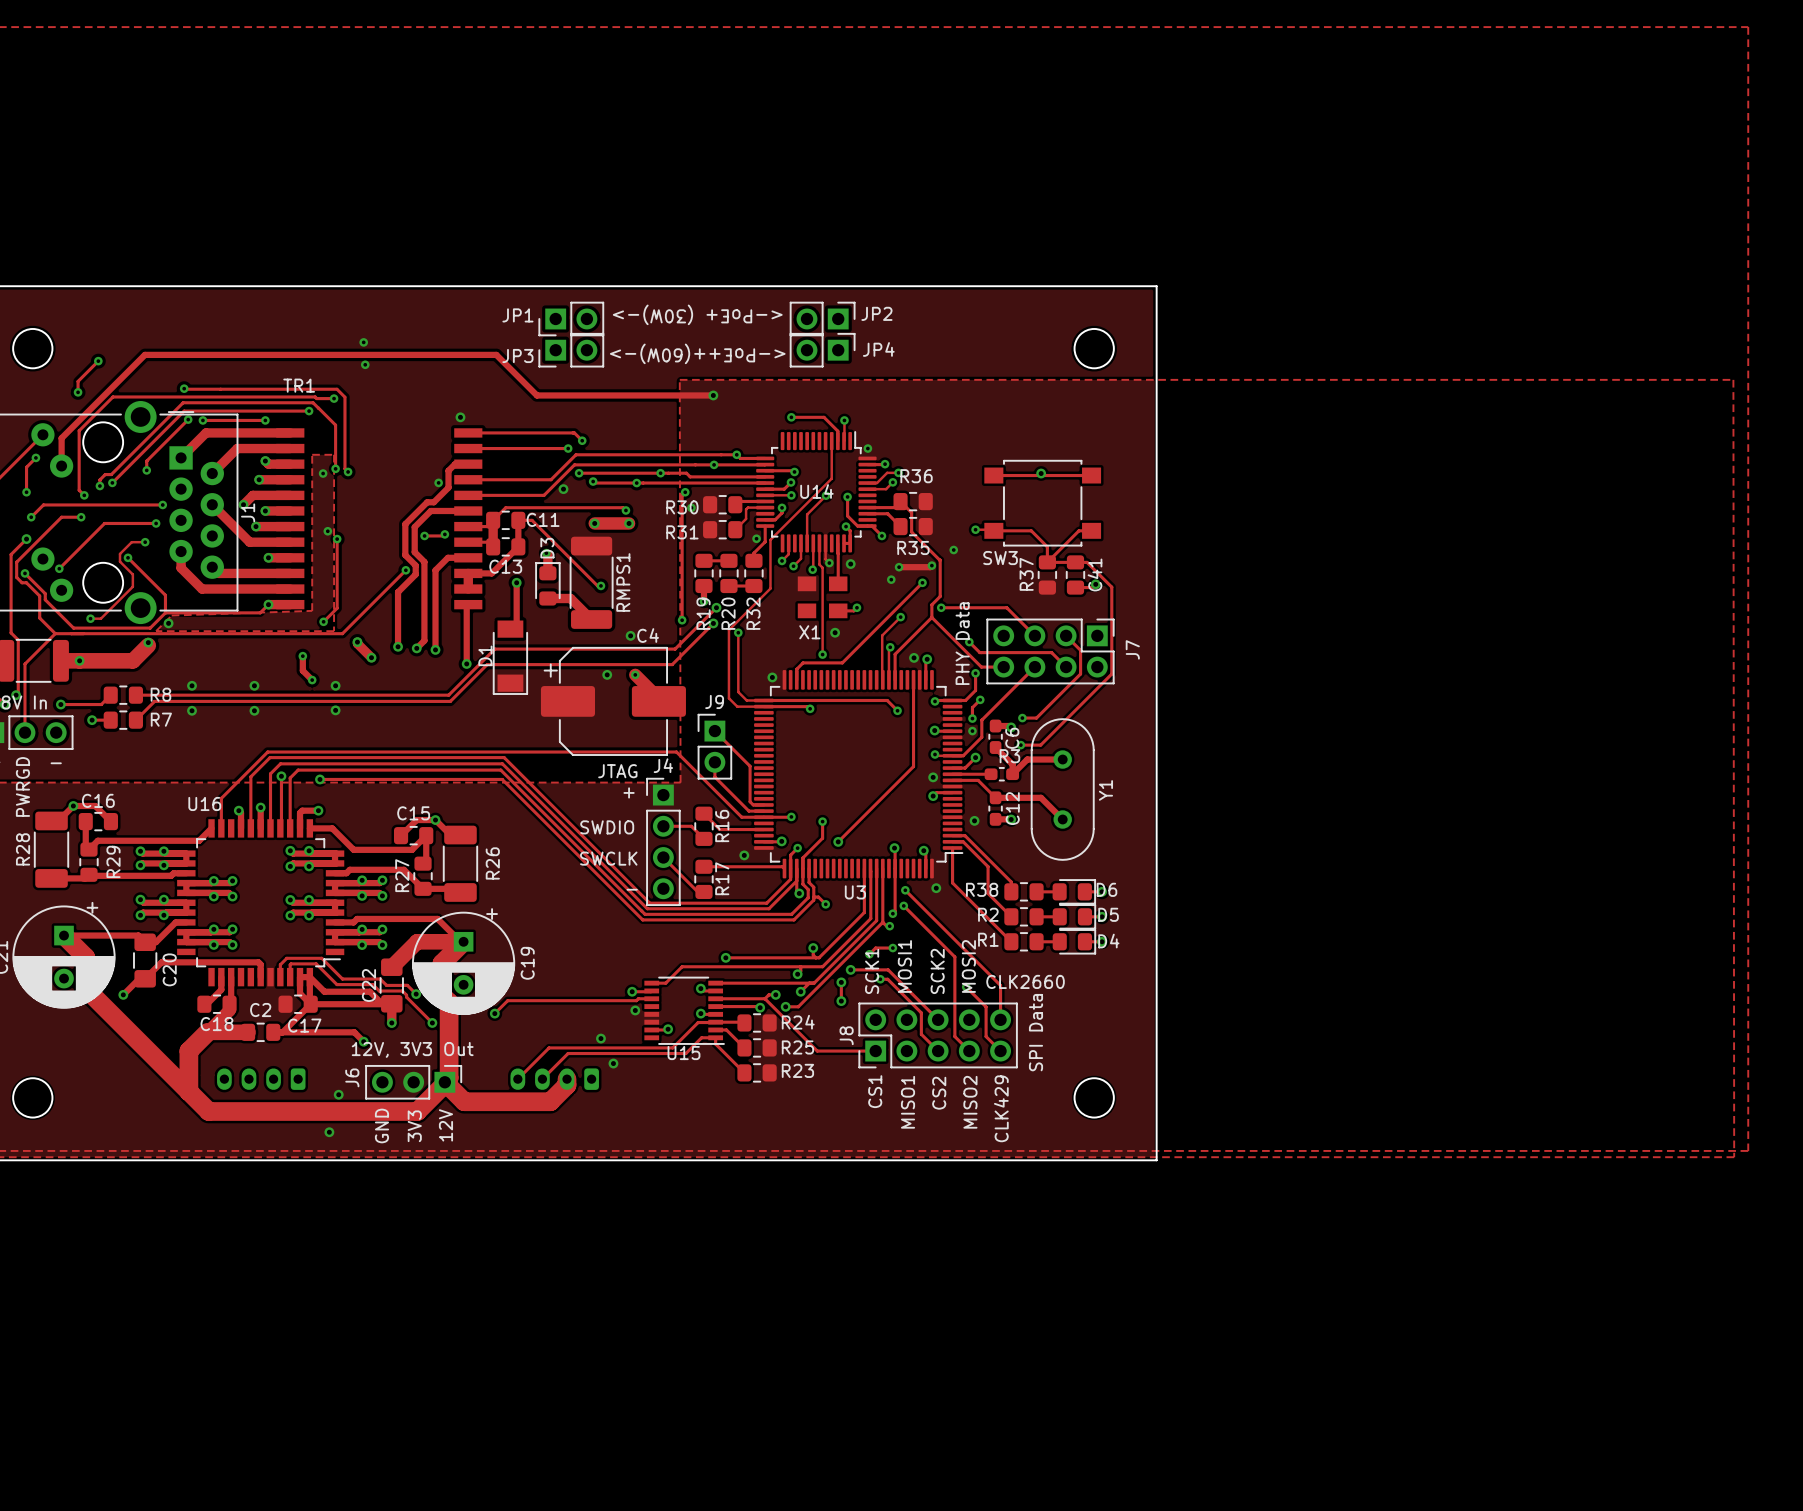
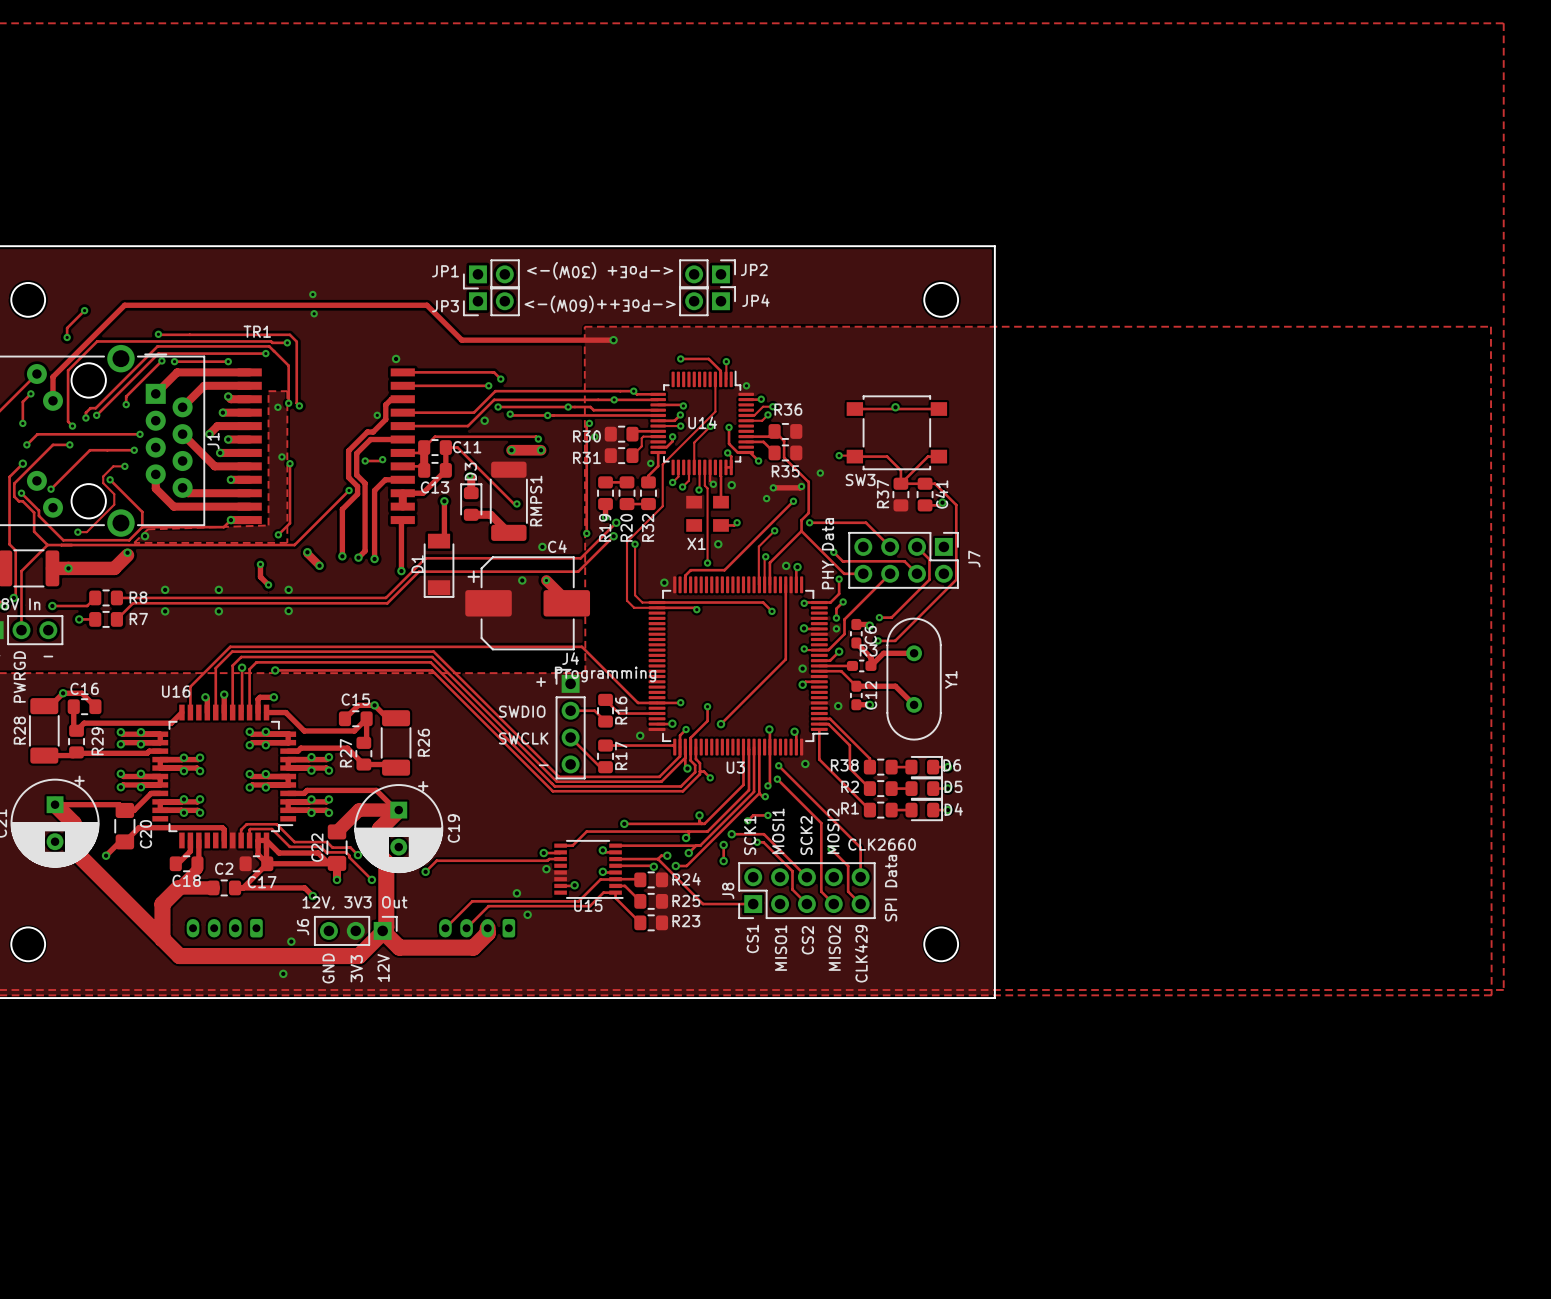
track: (714, 731) (750, 766) (750, 801) (753, 804) (763, 804) -> none
J9: (714, 746) -> none
track: (714, 762) (714, 777) (748, 811) (763, 811) -> none
J4 value: JTAG (617, 771) -> Programming (605, 674)

